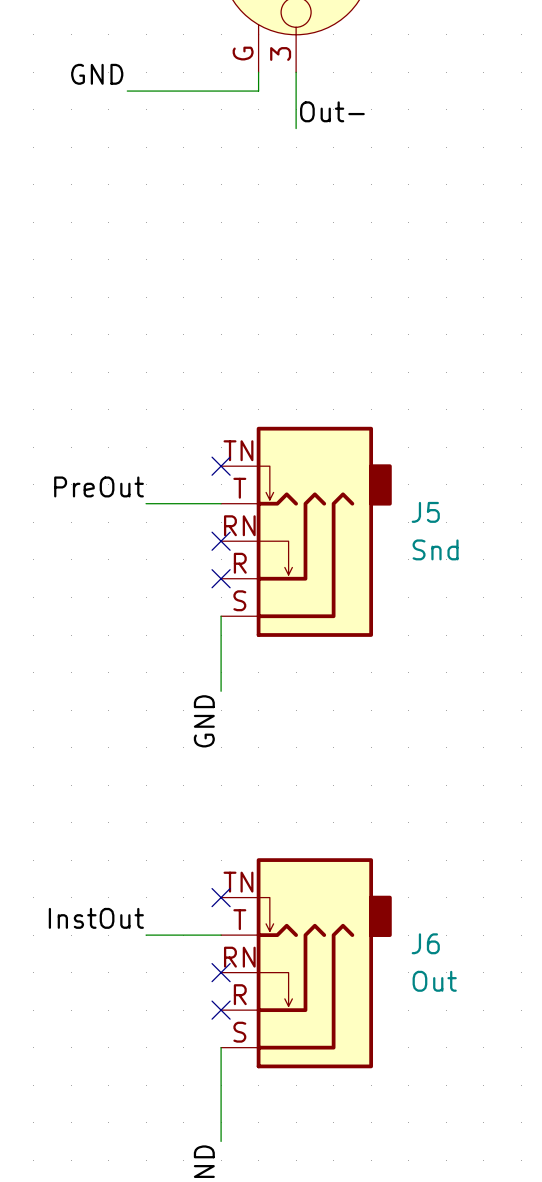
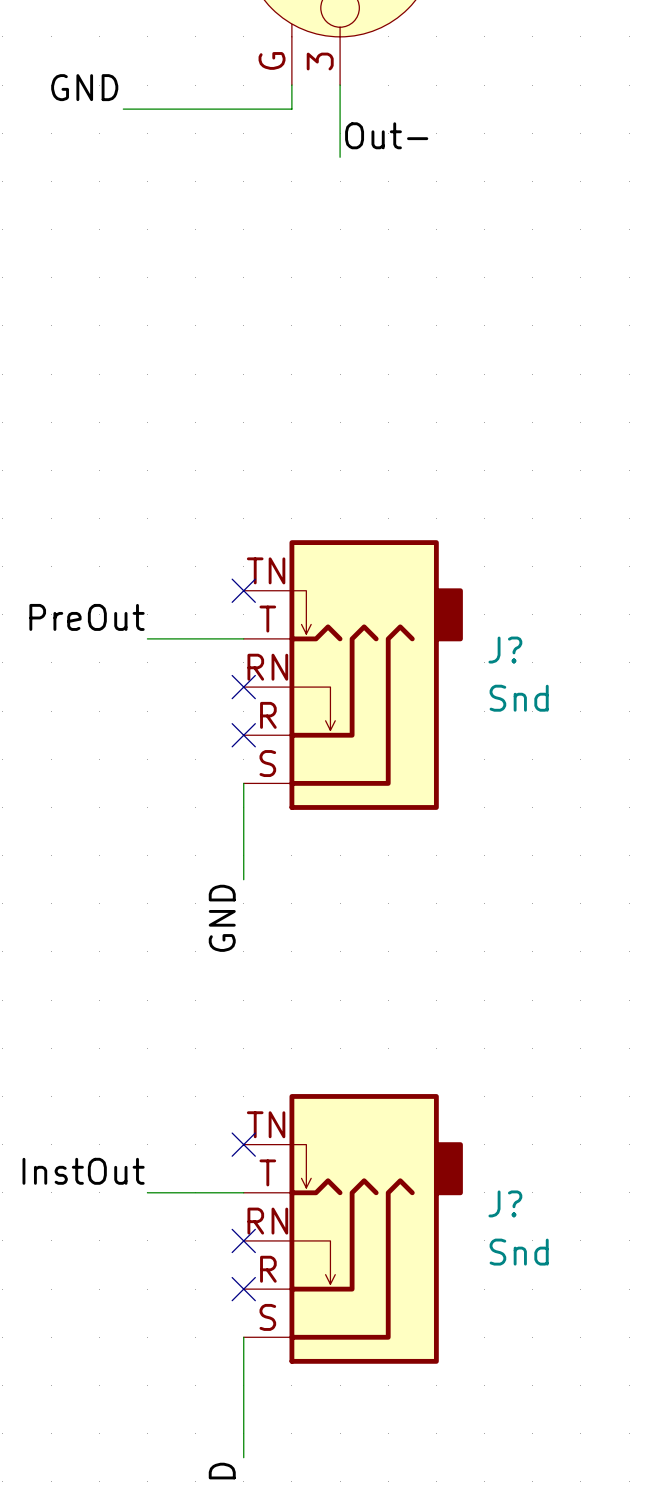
J5 name: J5 (425, 512) -> J? (505, 650)
J6 name: J6 (425, 943) -> J? (505, 1203)
J6 value: Out (434, 981) -> Snd (519, 1252)

